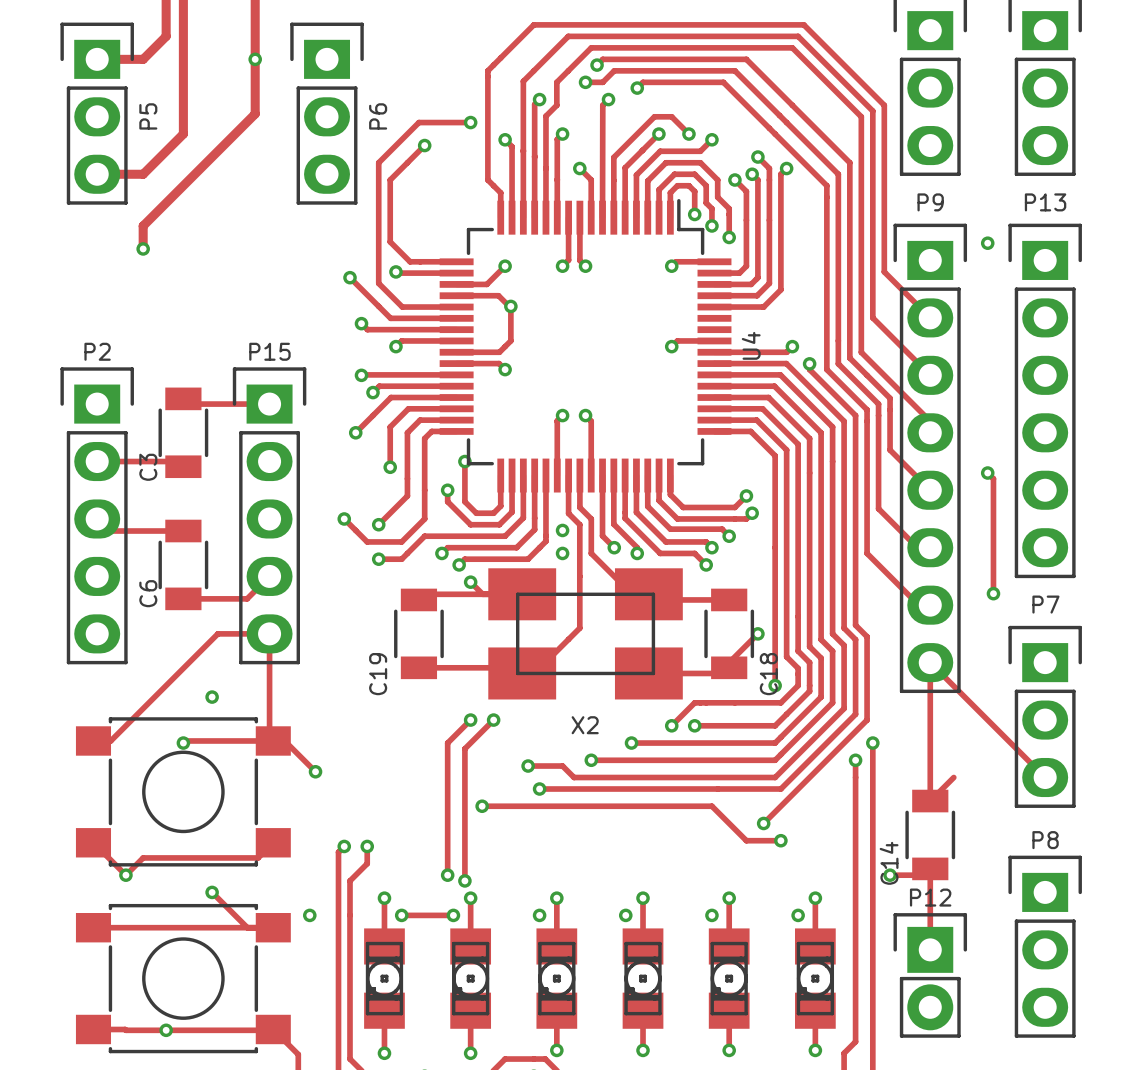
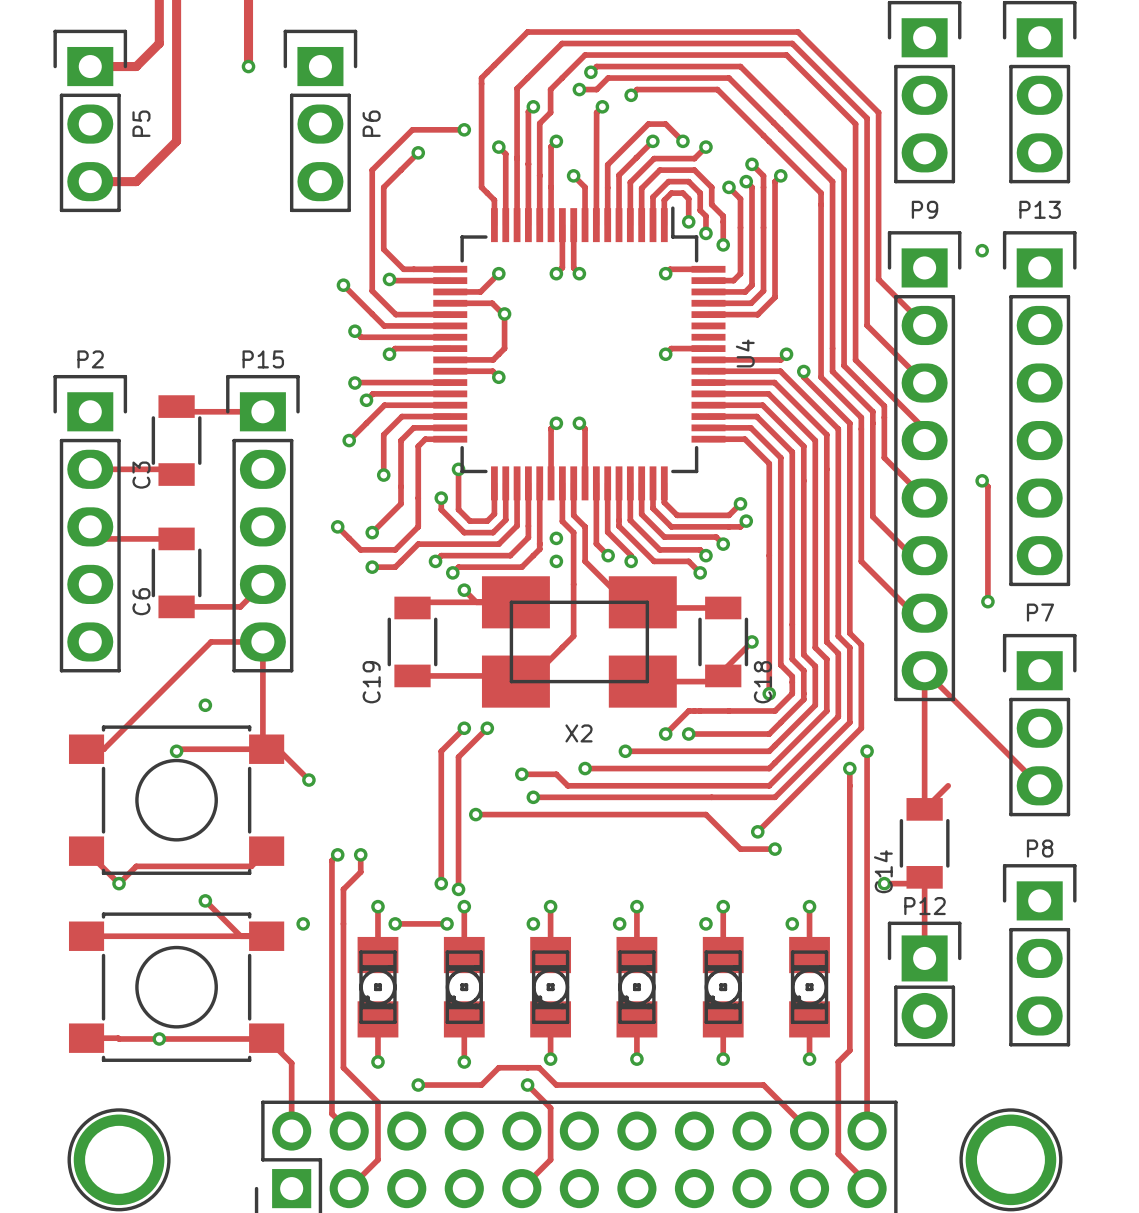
track: (255, 59) (255, 113) (143, 225) (143, 248) -> none
via: (143, 248) -> none

